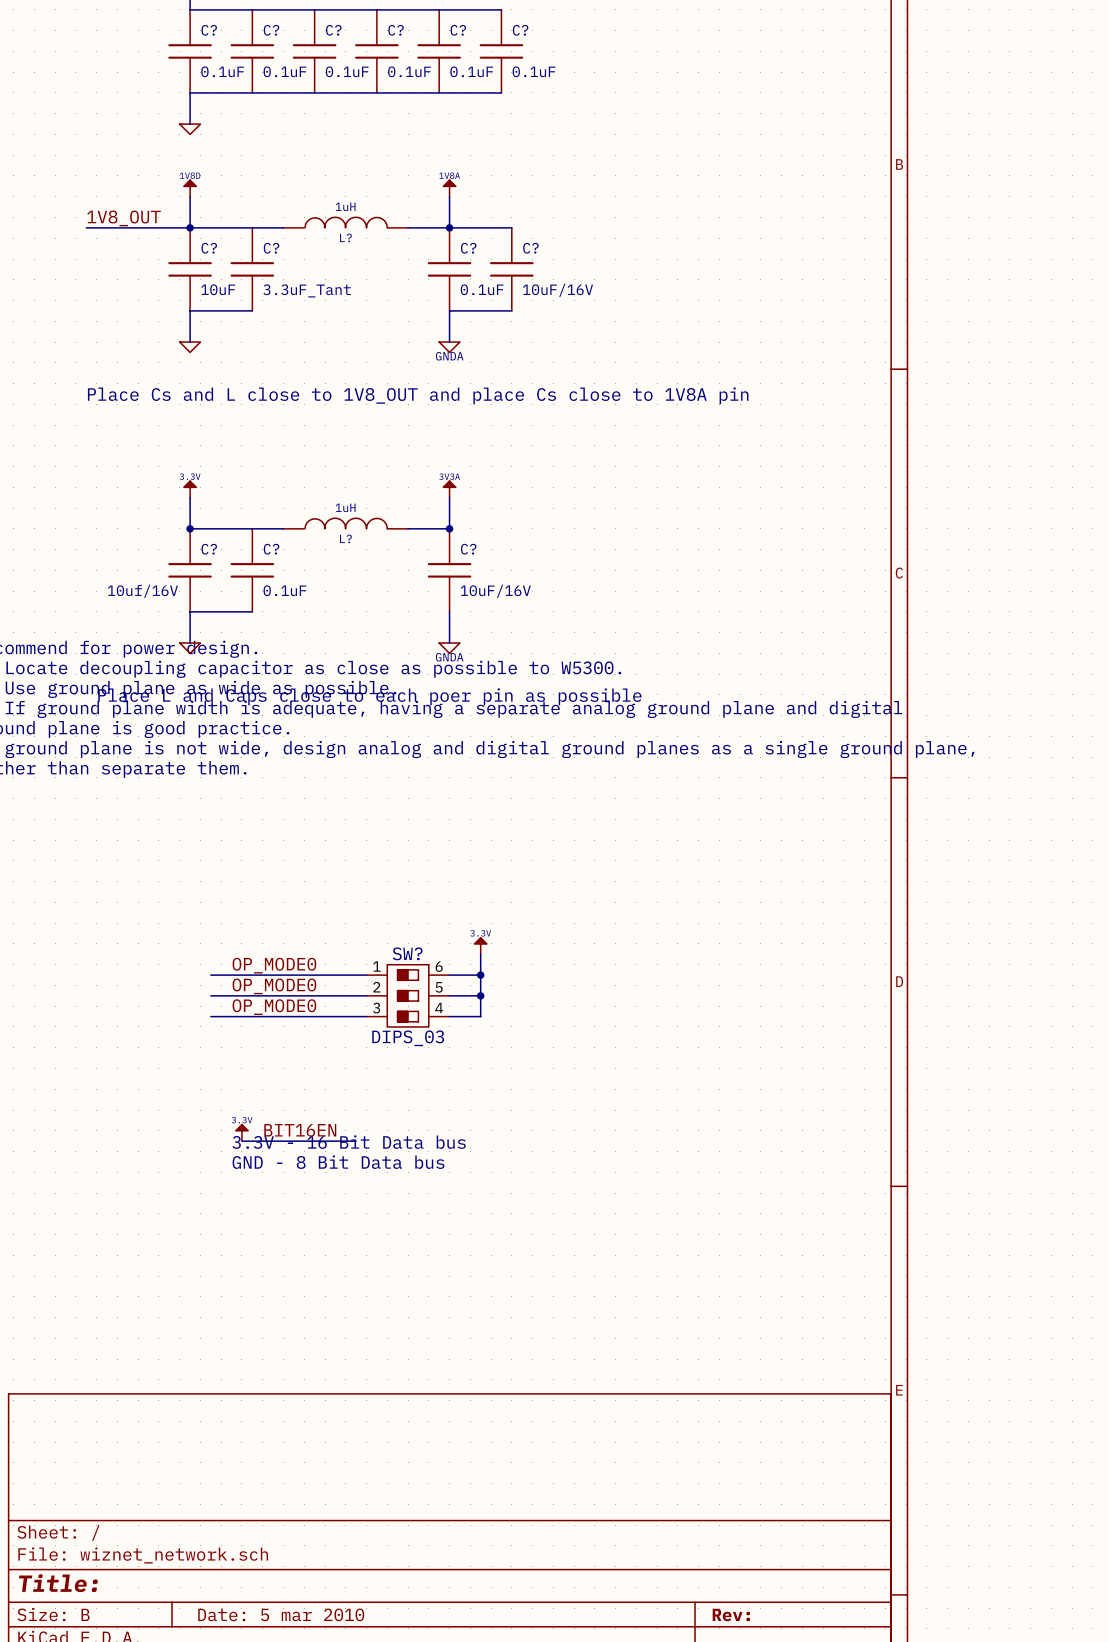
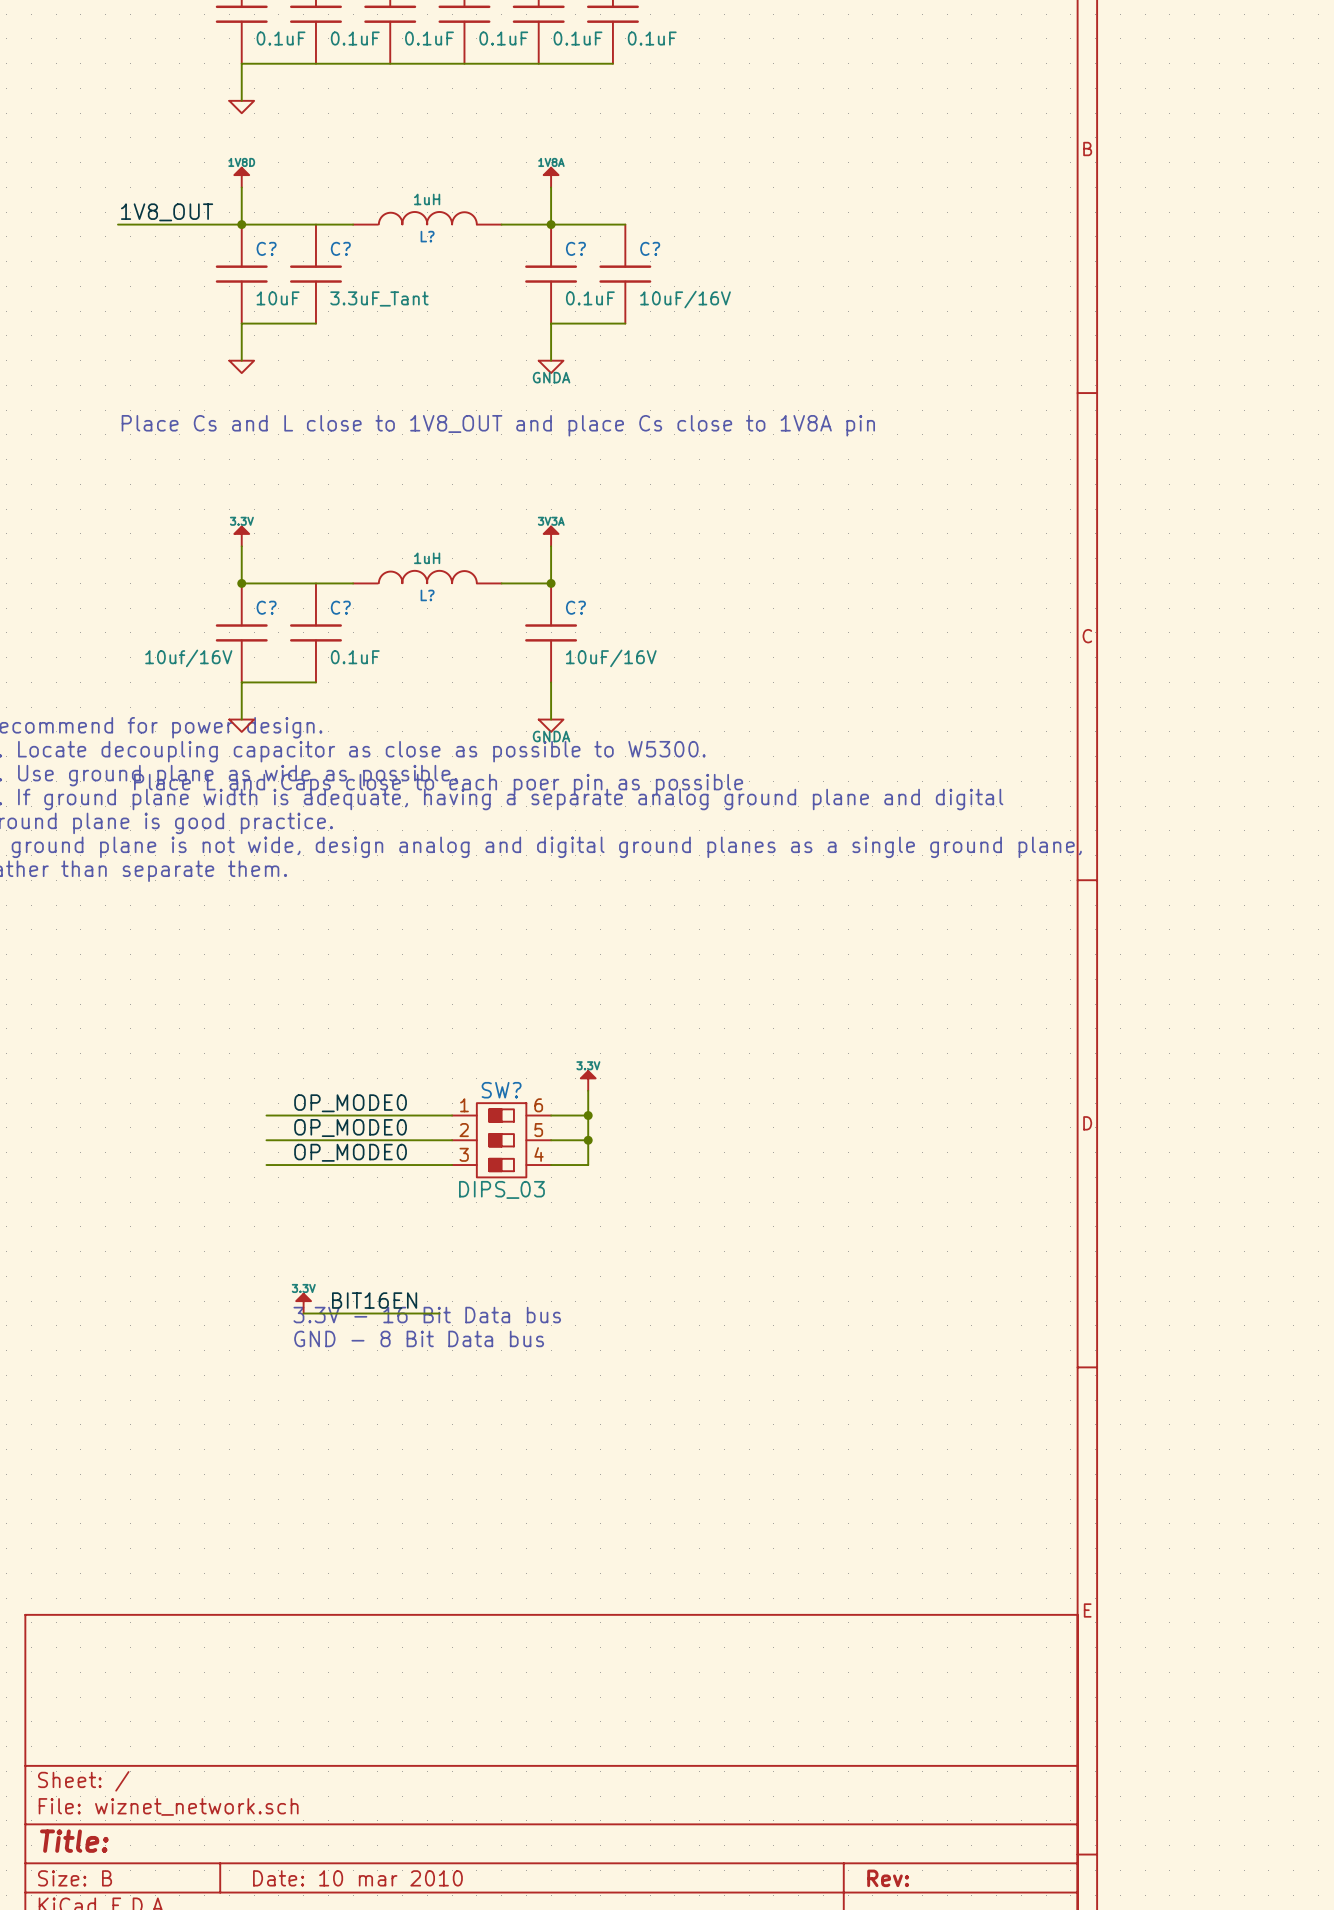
title block: Date: 5 mar 2010 (281, 1614) -> Date: 10 mar 2010 (357, 1878)

